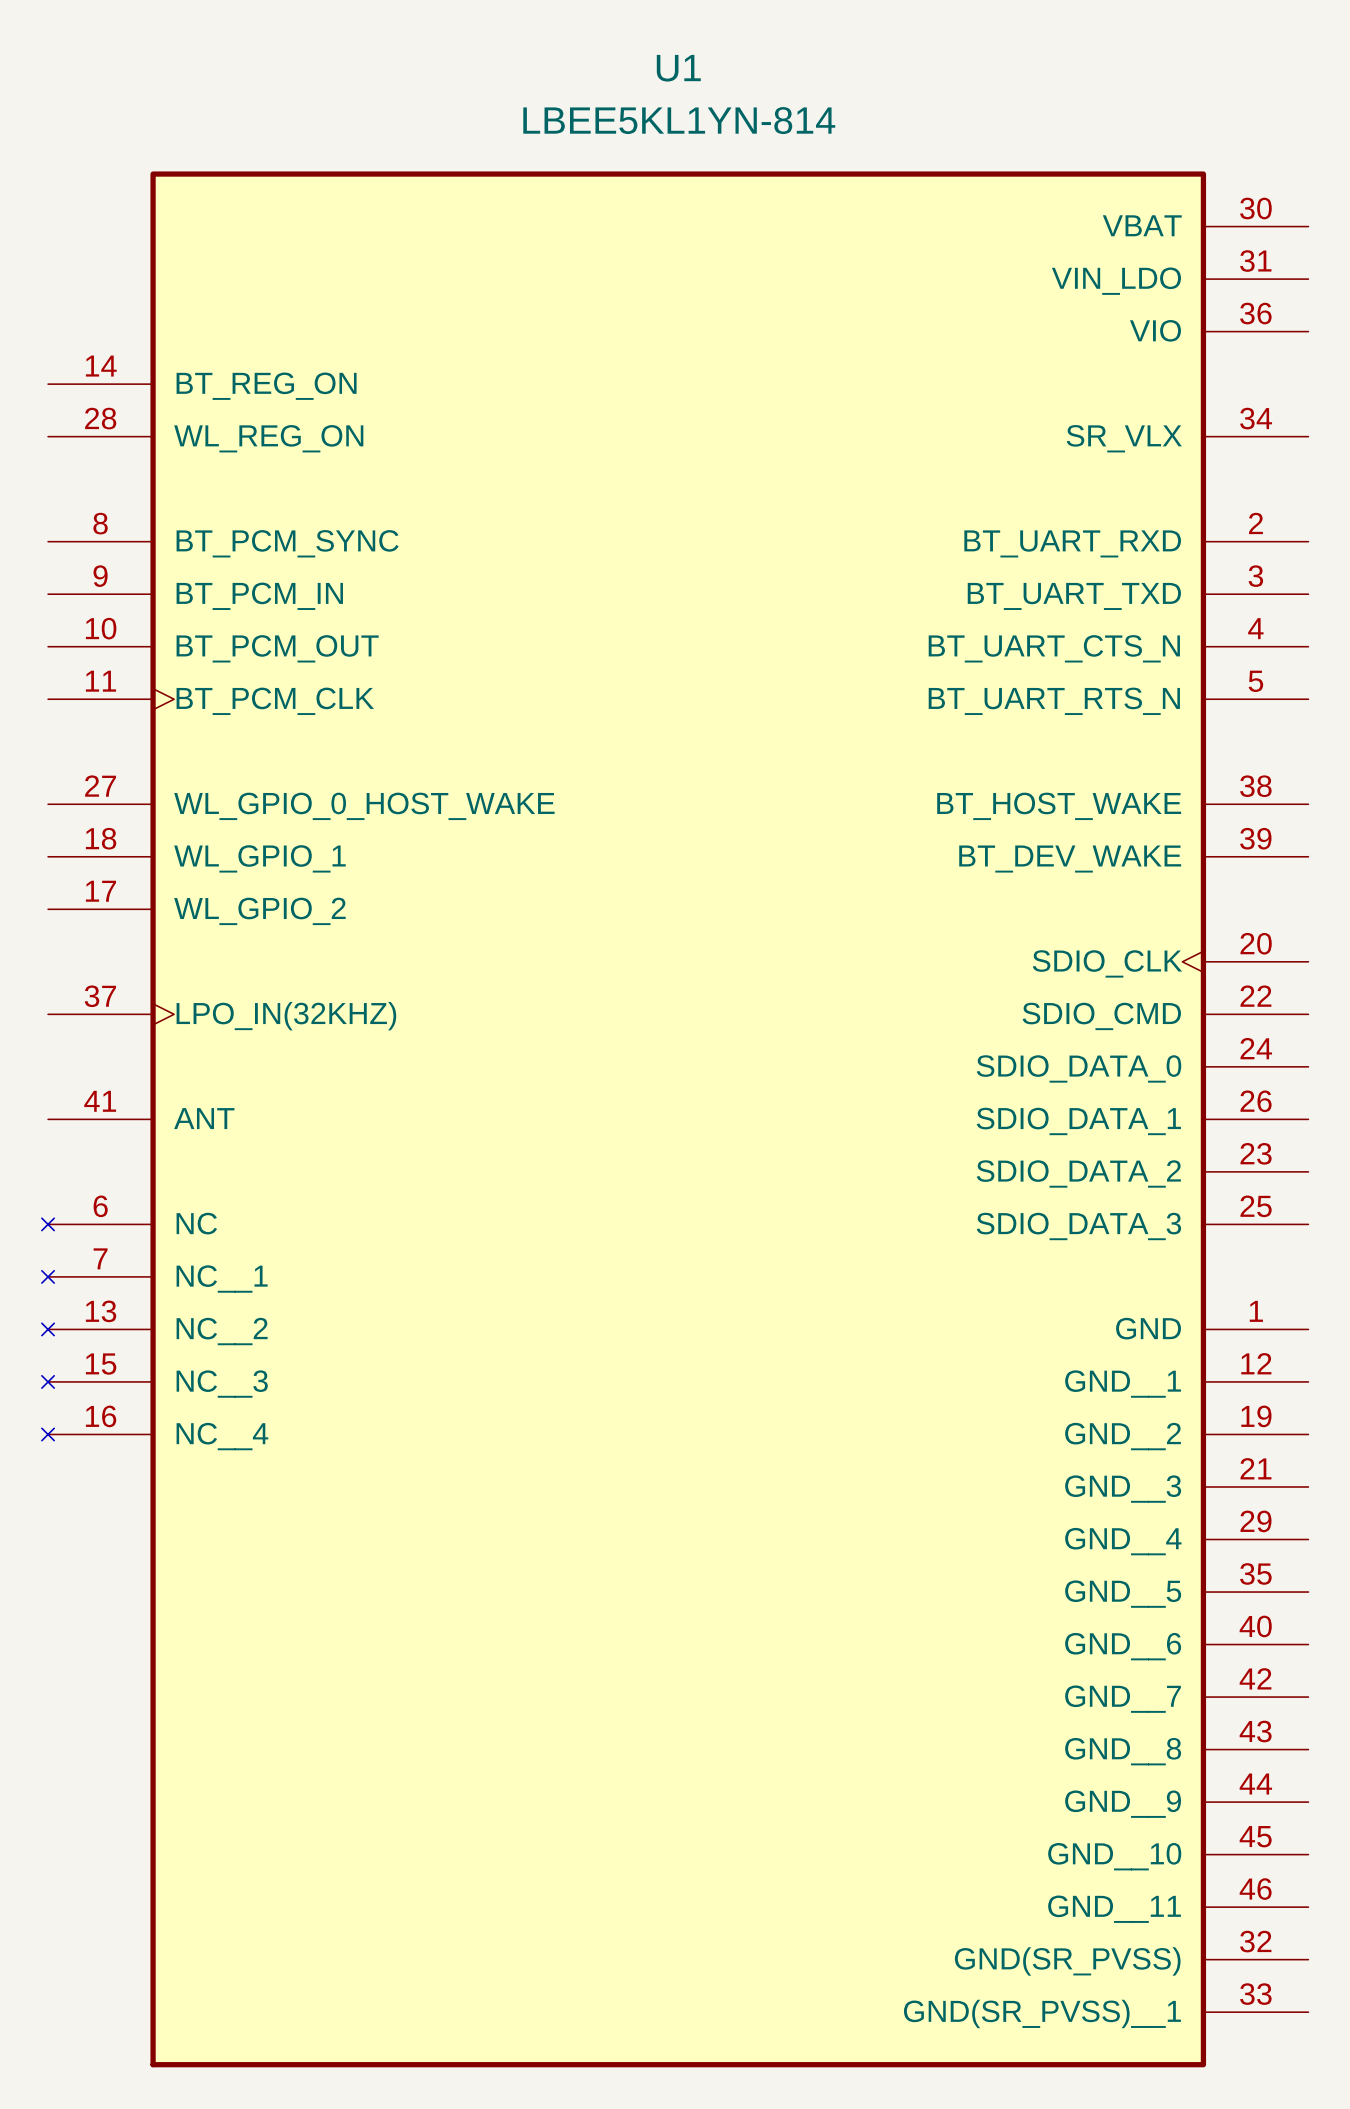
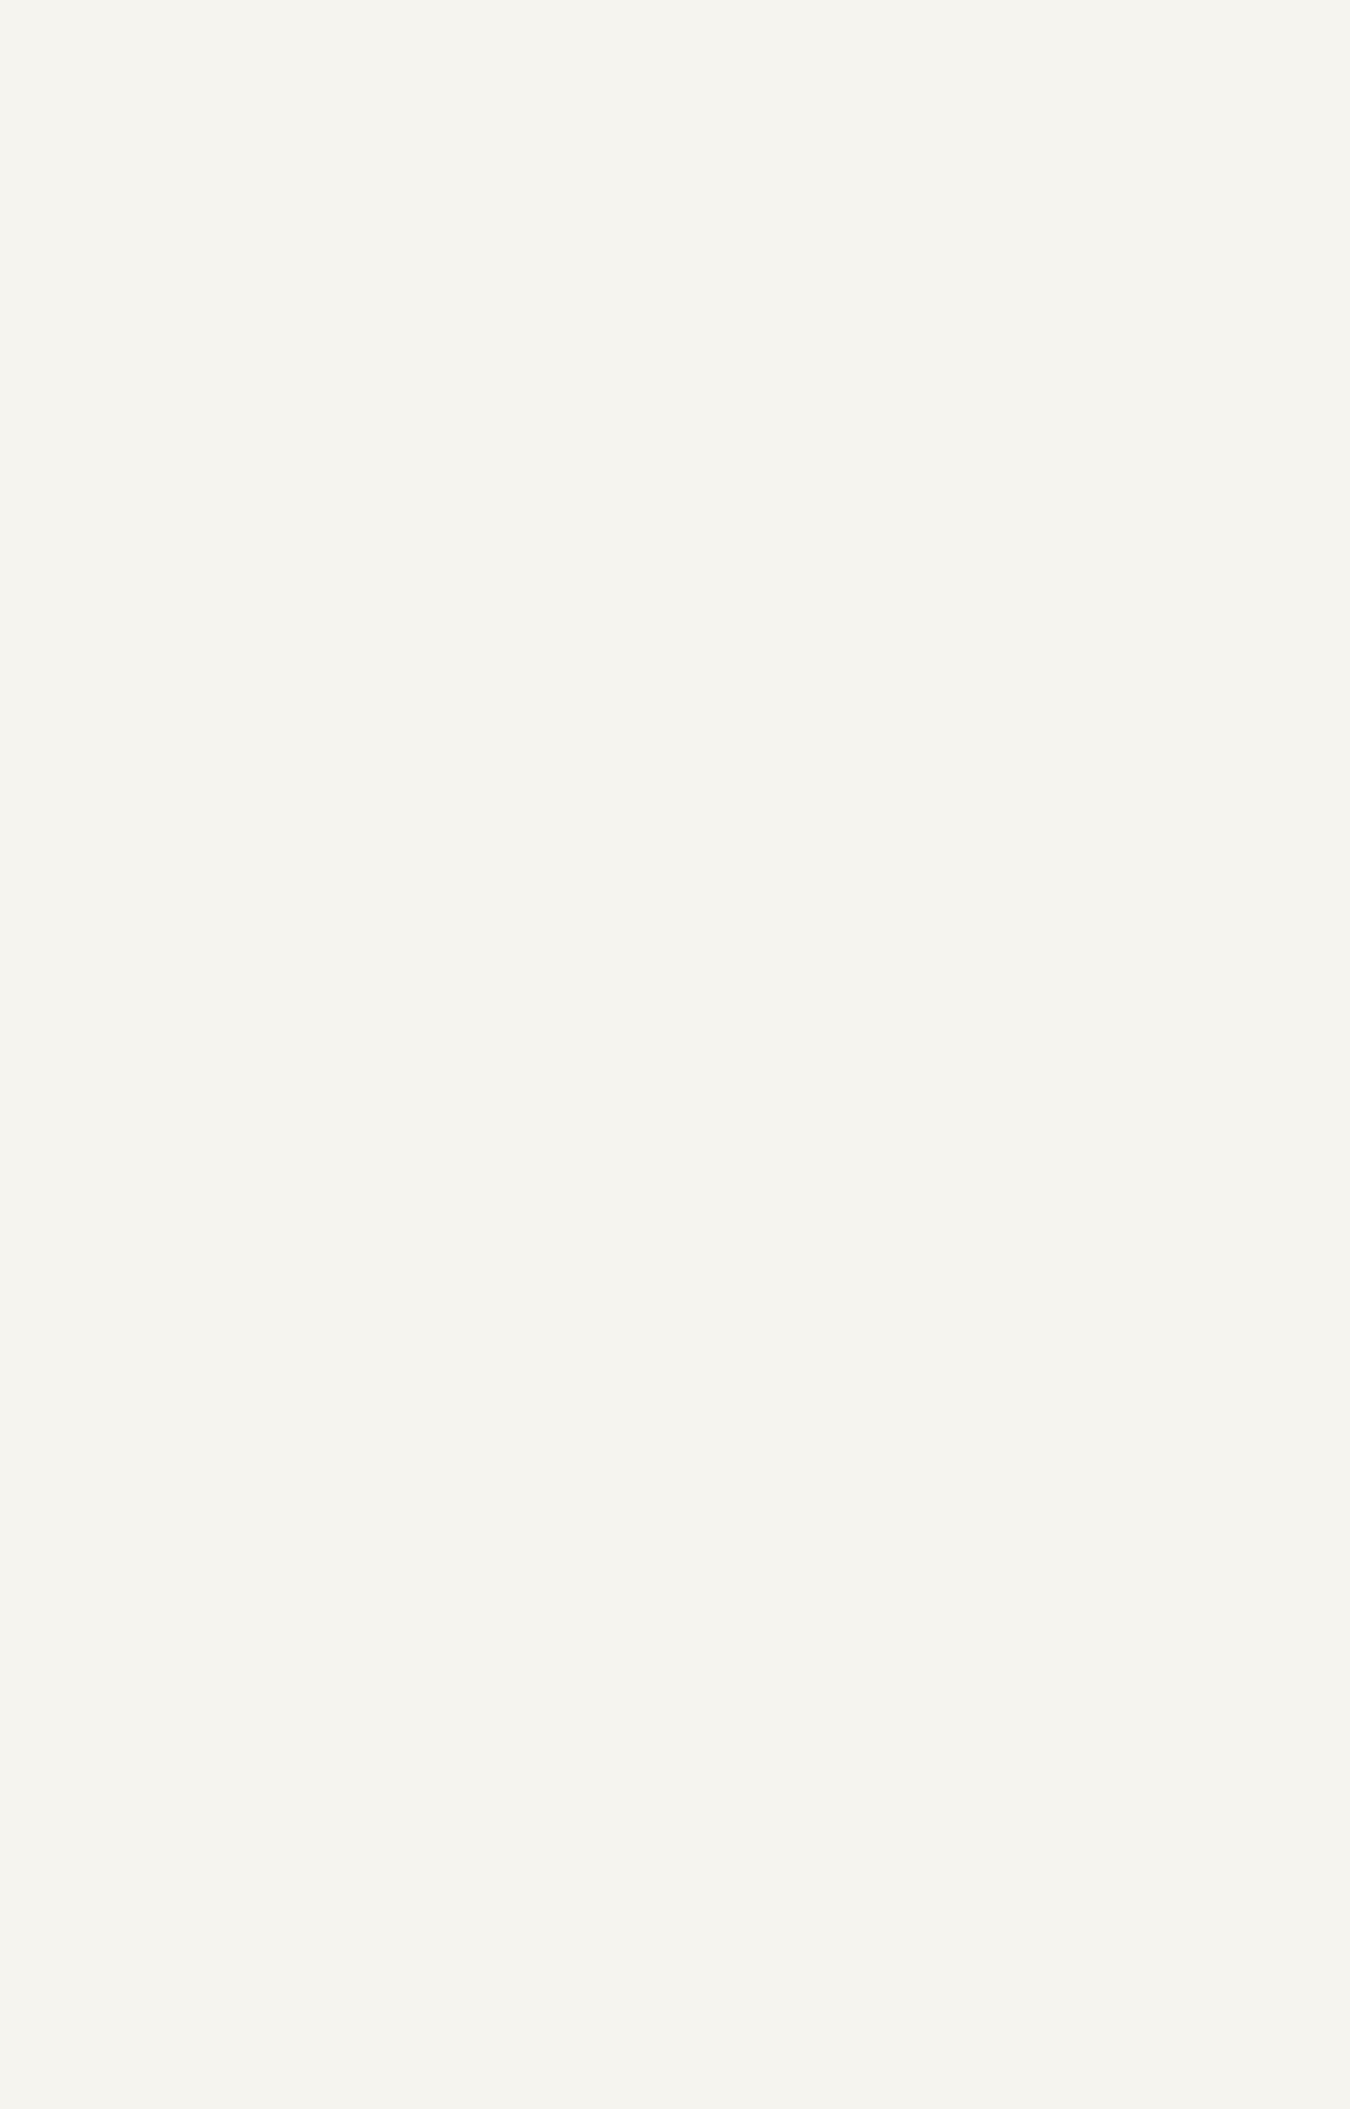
U1: LBEE5KL1YN-814 (675, 1119) -> none

